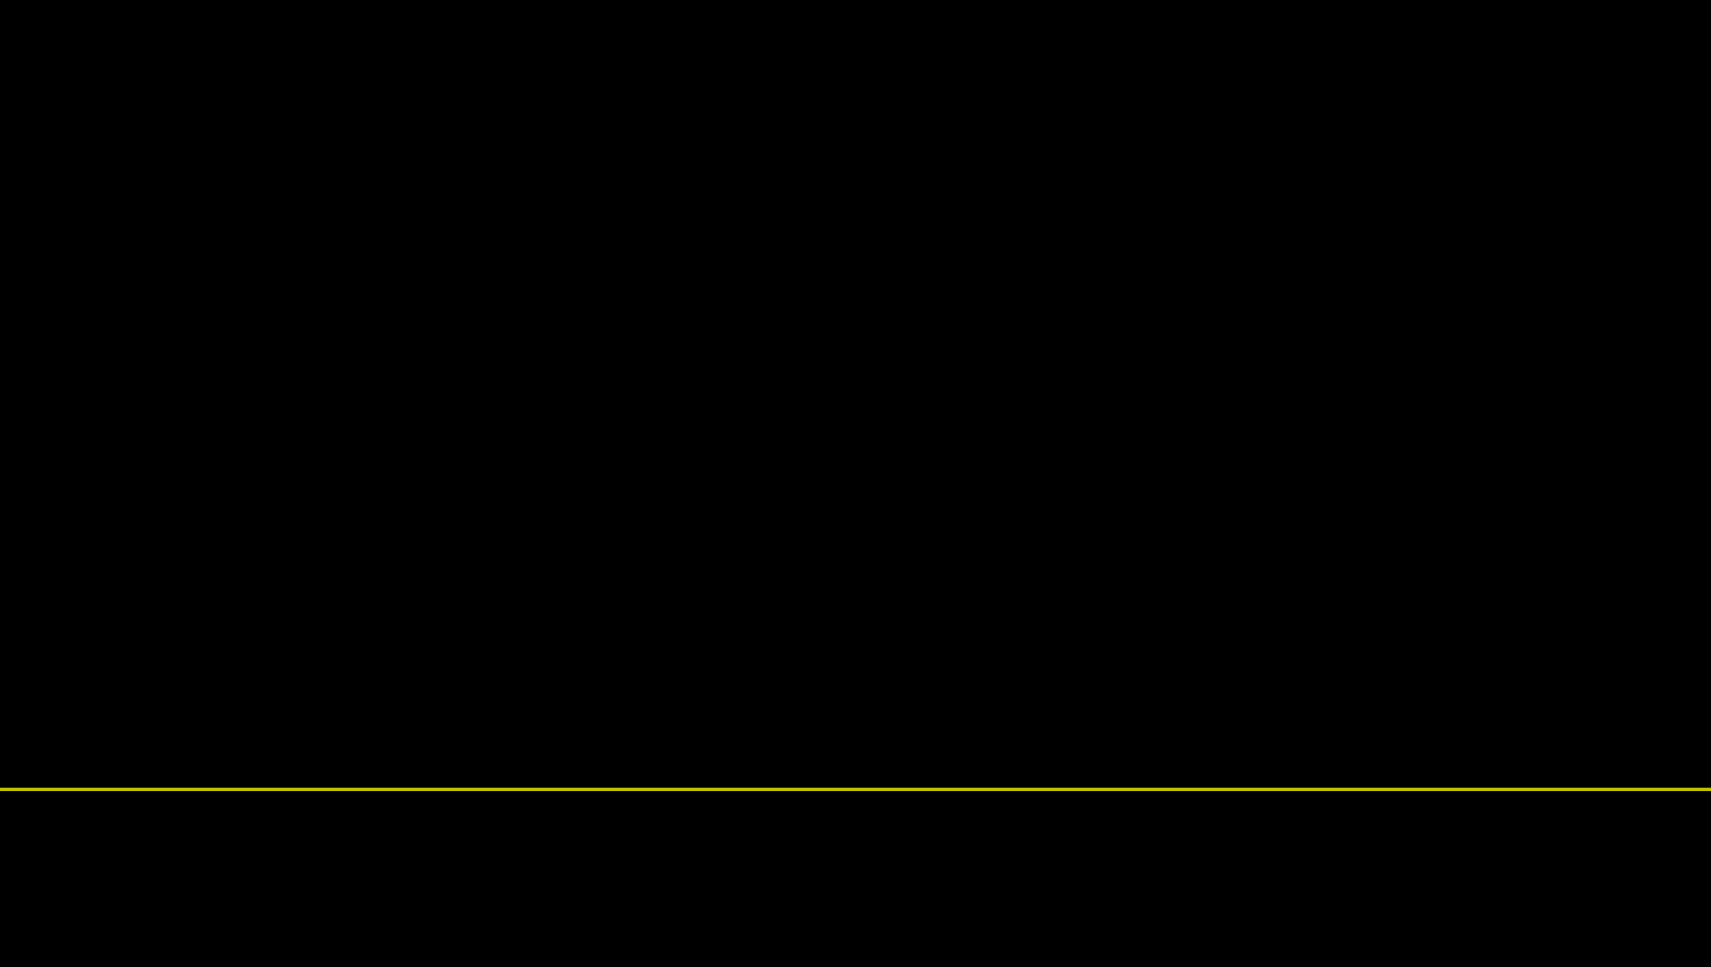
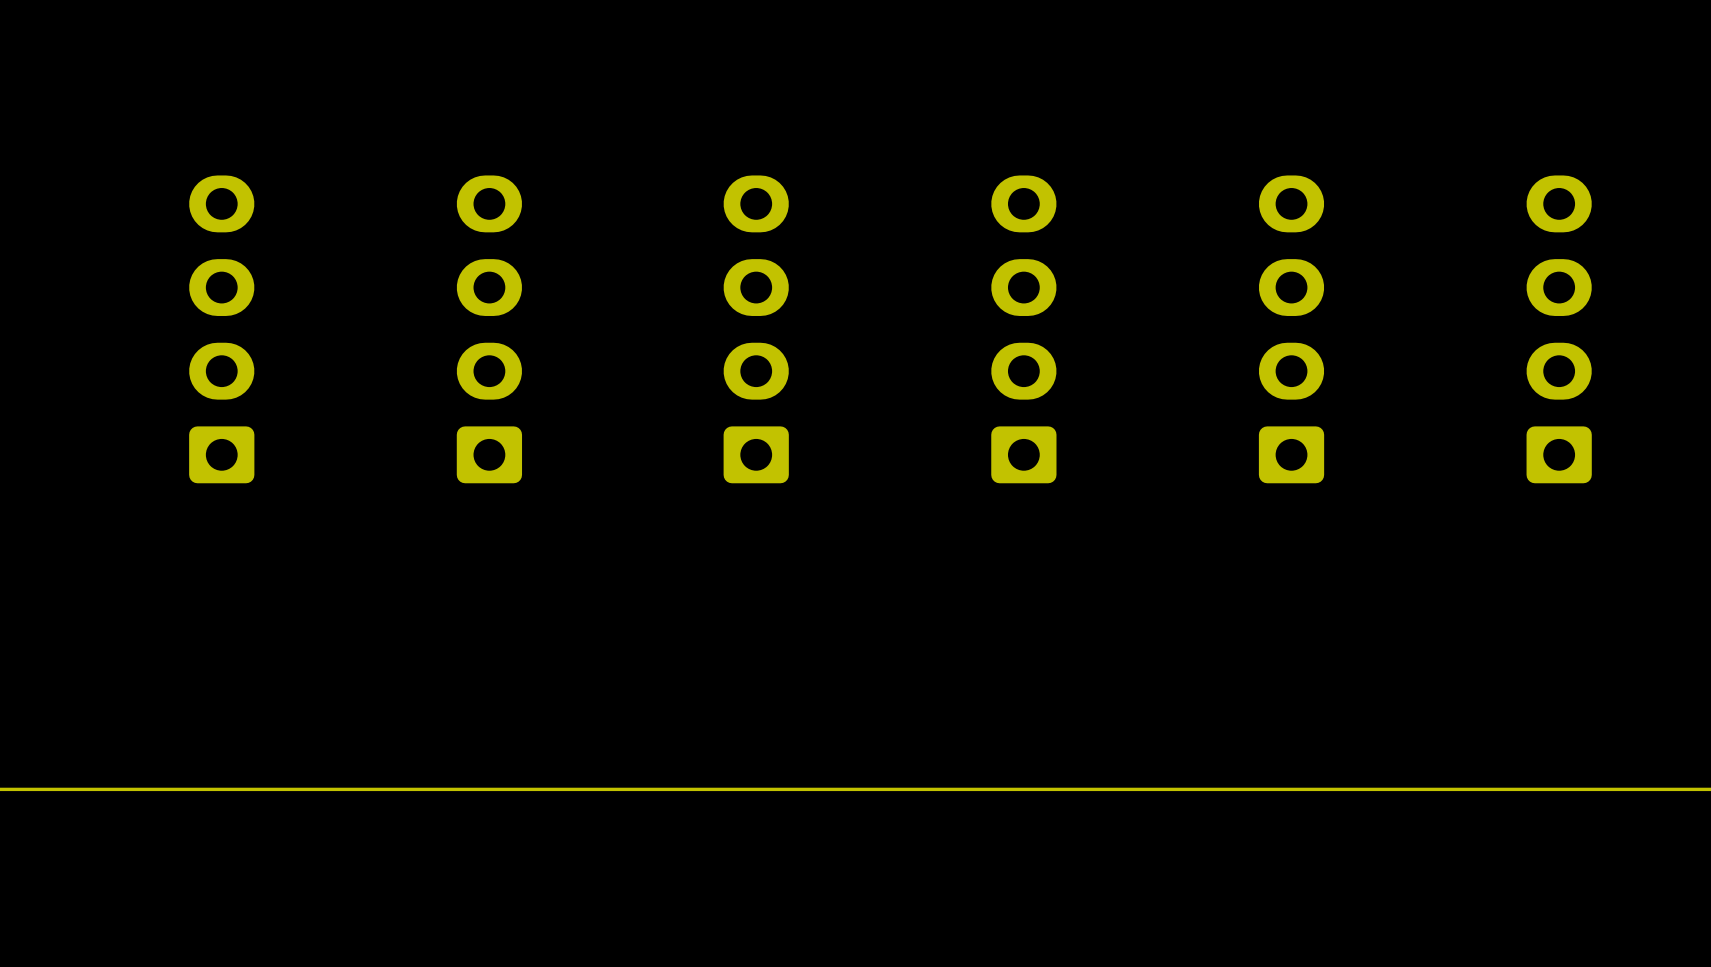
part: none -> (221, 329)
part: none -> (489, 329)
part: none -> (756, 329)
part: none -> (1023, 329)
part: none -> (1291, 329)
part: none -> (1559, 329)

